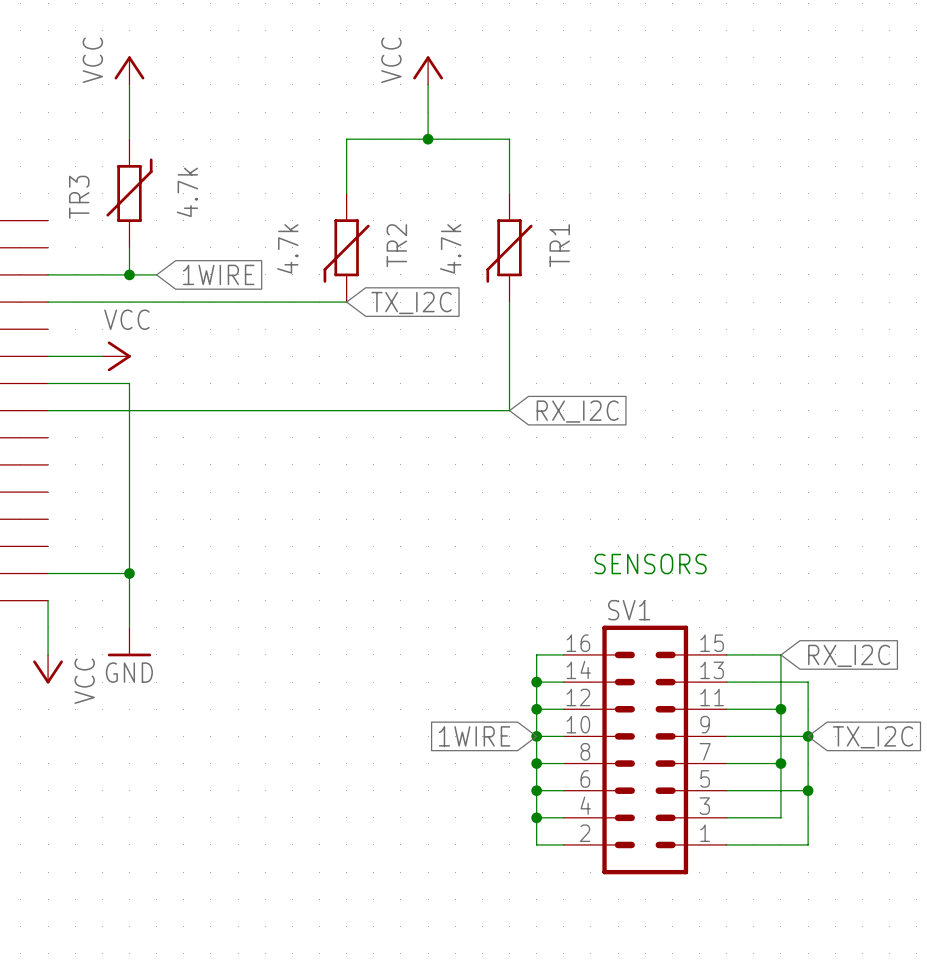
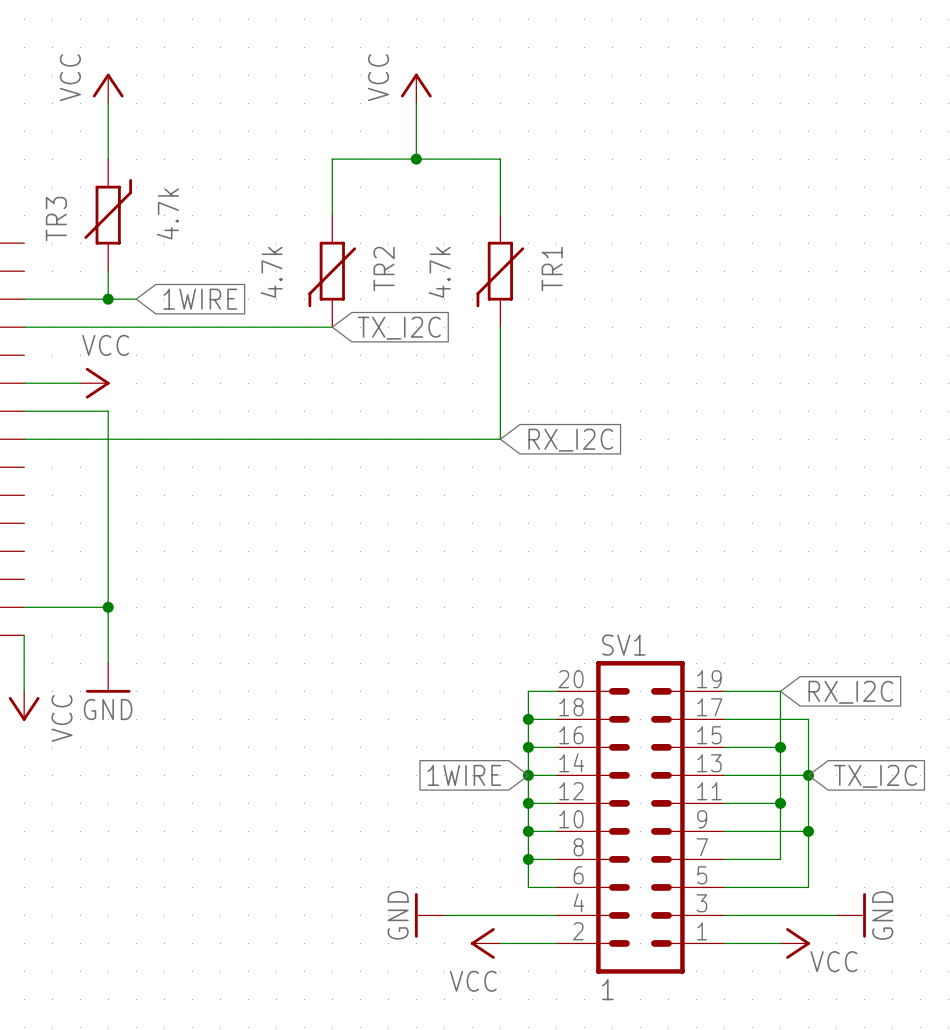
text: SENSORS (650, 564) -> none
SV1 symbol: [563, 625, 727, 875] -> [556, 661, 725, 974]
power symbol: none -> GND (429, 915)
wire: none -> (444, 915) (556, 915)
wire: none -> (724, 915) (836, 915)
power symbol: none -> GND (851, 915)
power symbol: none -> VCC (485, 943)
wire: none -> (500, 943) (556, 943)
wire: none -> (724, 943) (780, 943)
power symbol: none -> VCC (795, 943)
SV1 value: none -> 1 (607, 989)

